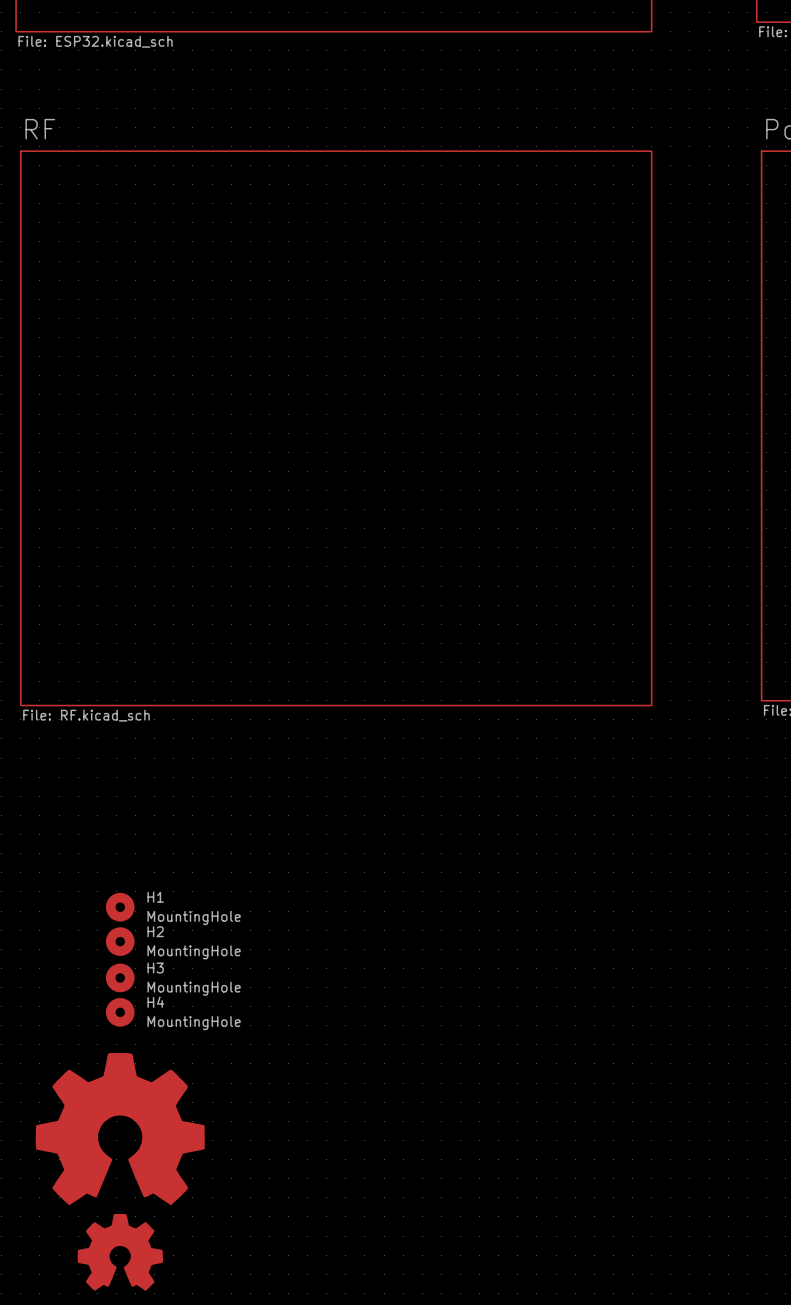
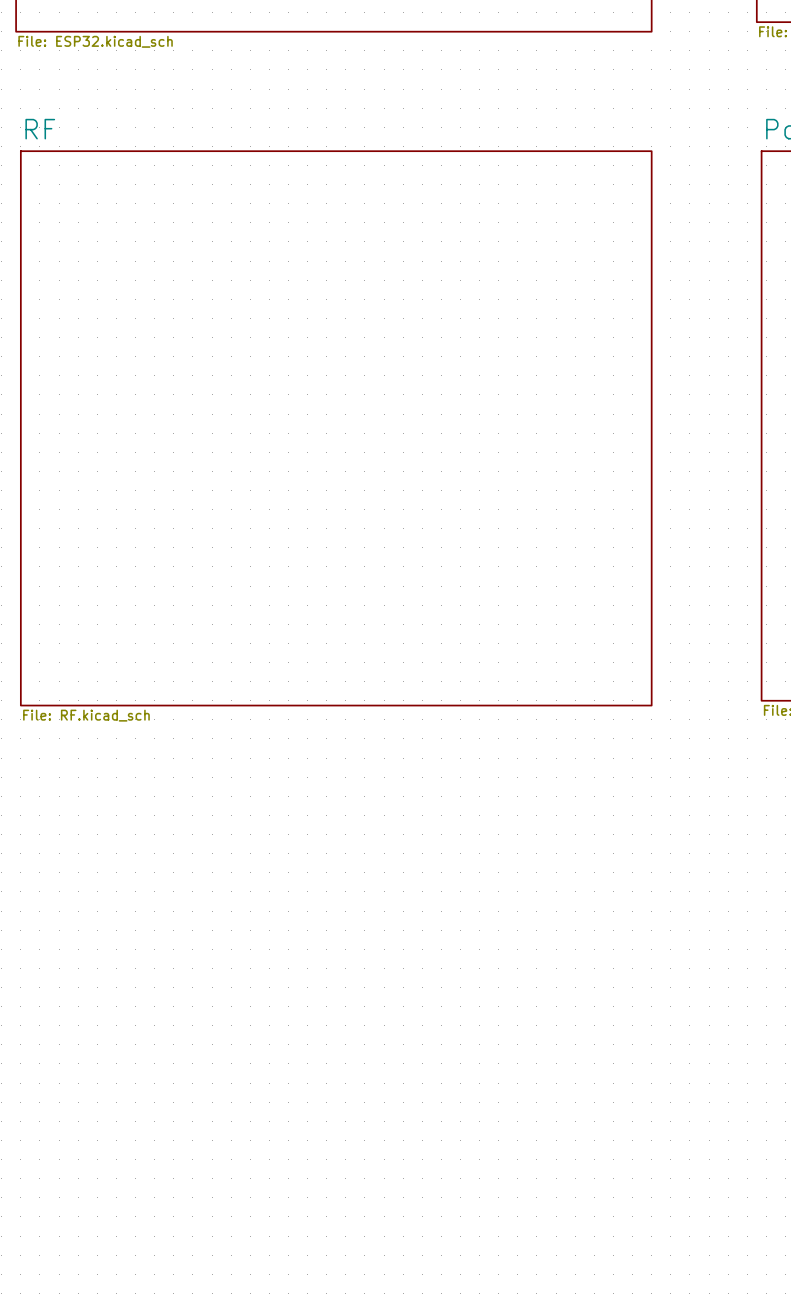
H1: MountingHole (120, 907) -> none
H2: MountingHole (120, 941) -> none
H3: MountingHole (120, 977) -> none
H4: MountingHole (120, 1012) -> none
power symbol: (120, 1128) -> none
power symbol: (120, 1252) -> none

